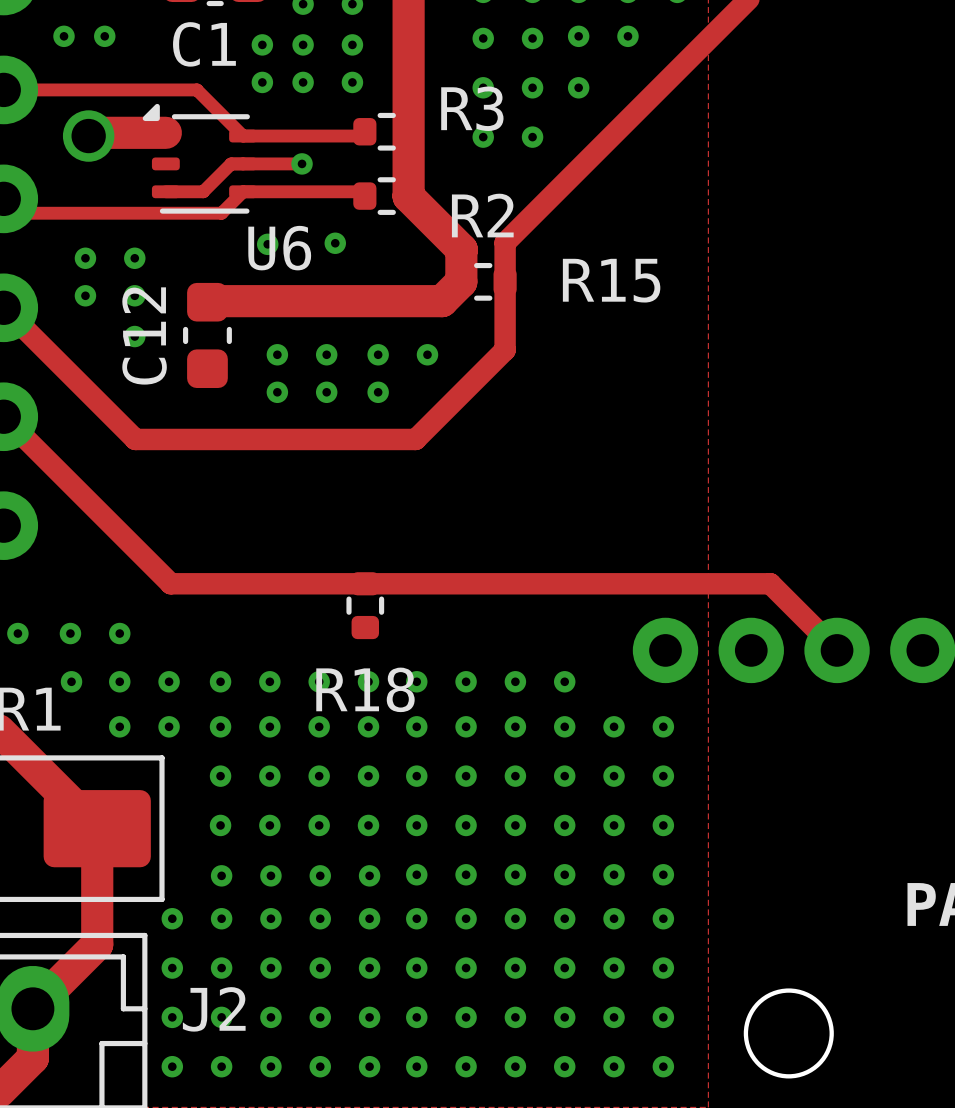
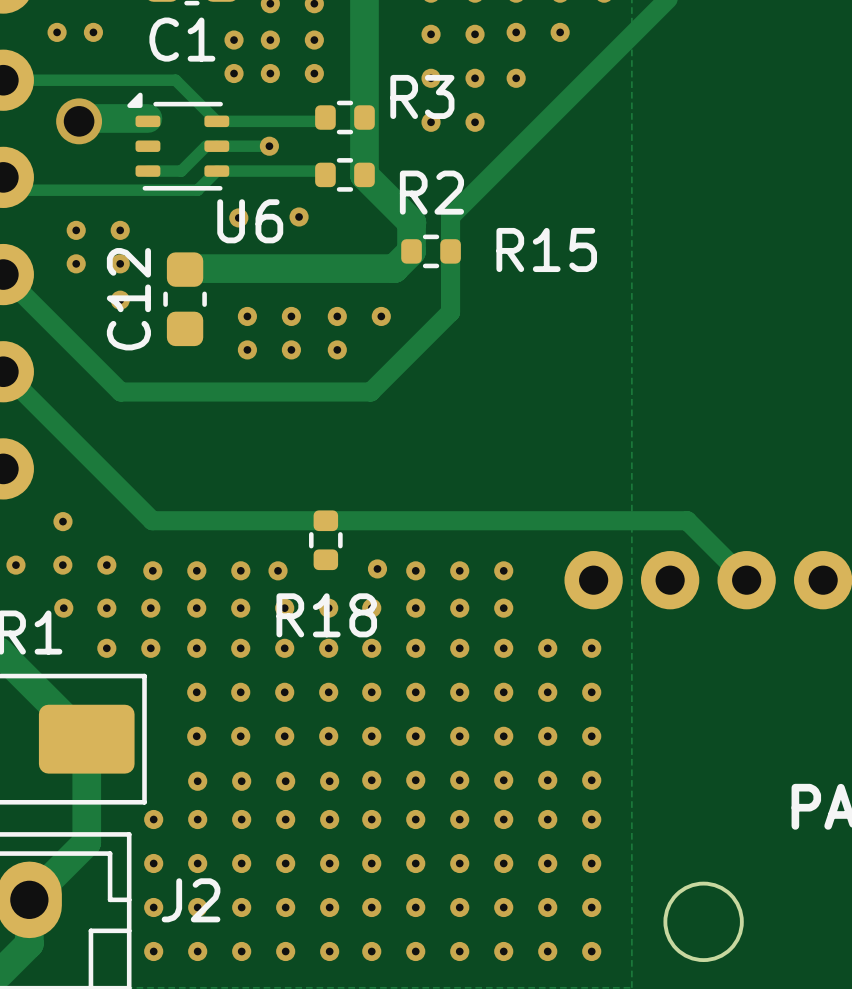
via: none -> (62, 521)
via: none -> (377, 568)
via: none -> (152, 570)
via: none -> (196, 570)
via: none -> (240, 570)
via: none -> (278, 570)
via: none -> (415, 570)
via: none -> (459, 570)
via: none -> (503, 570)

